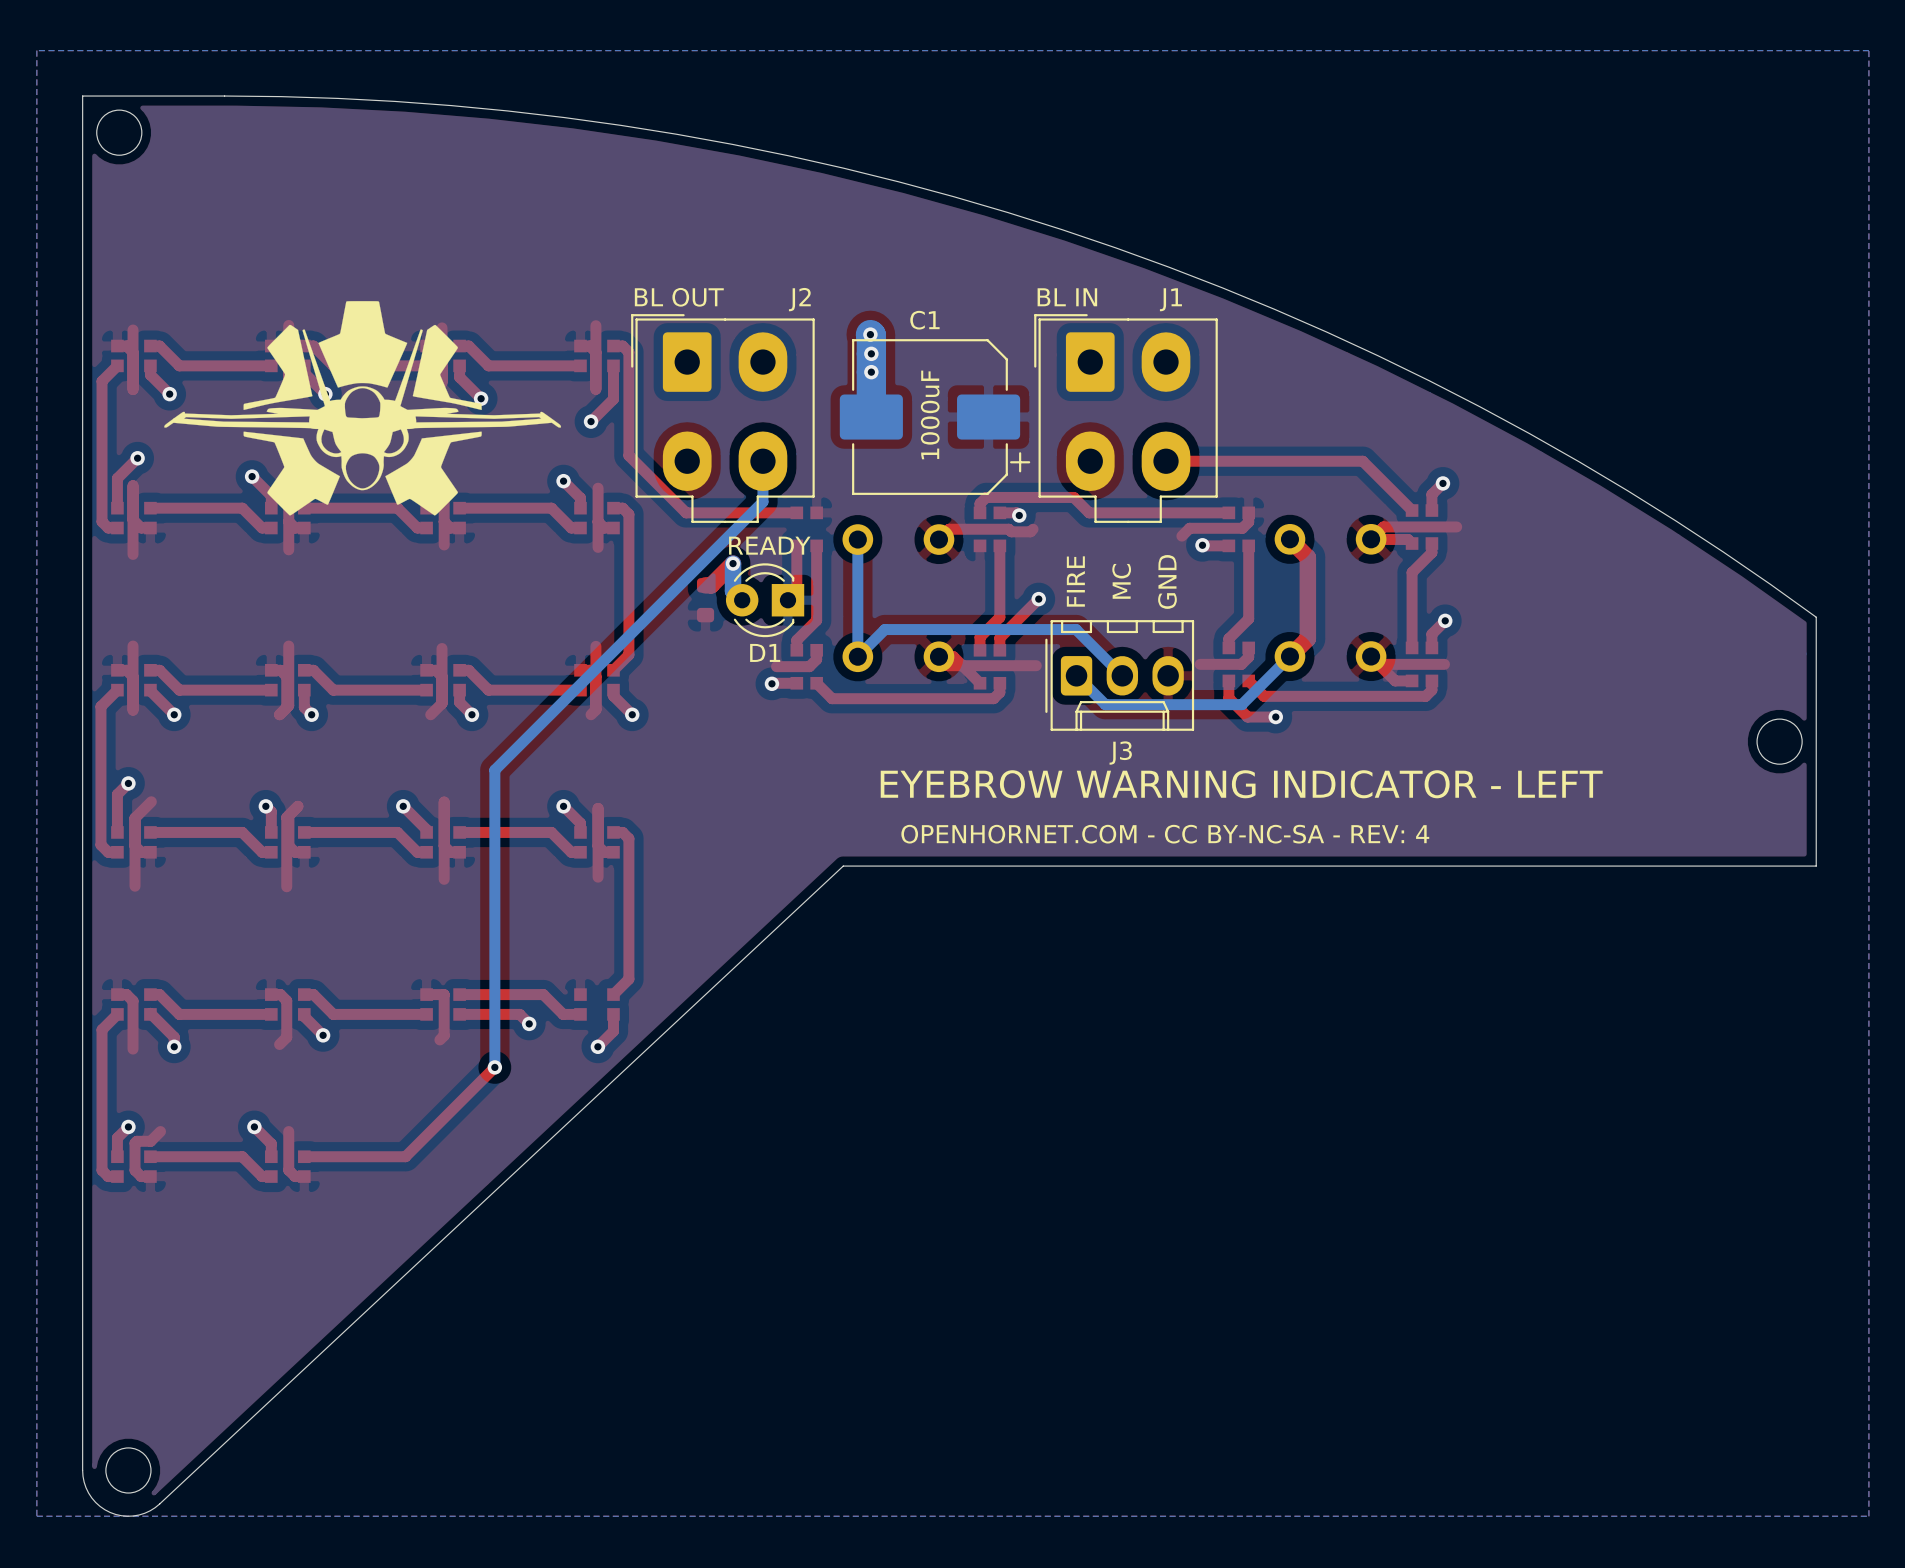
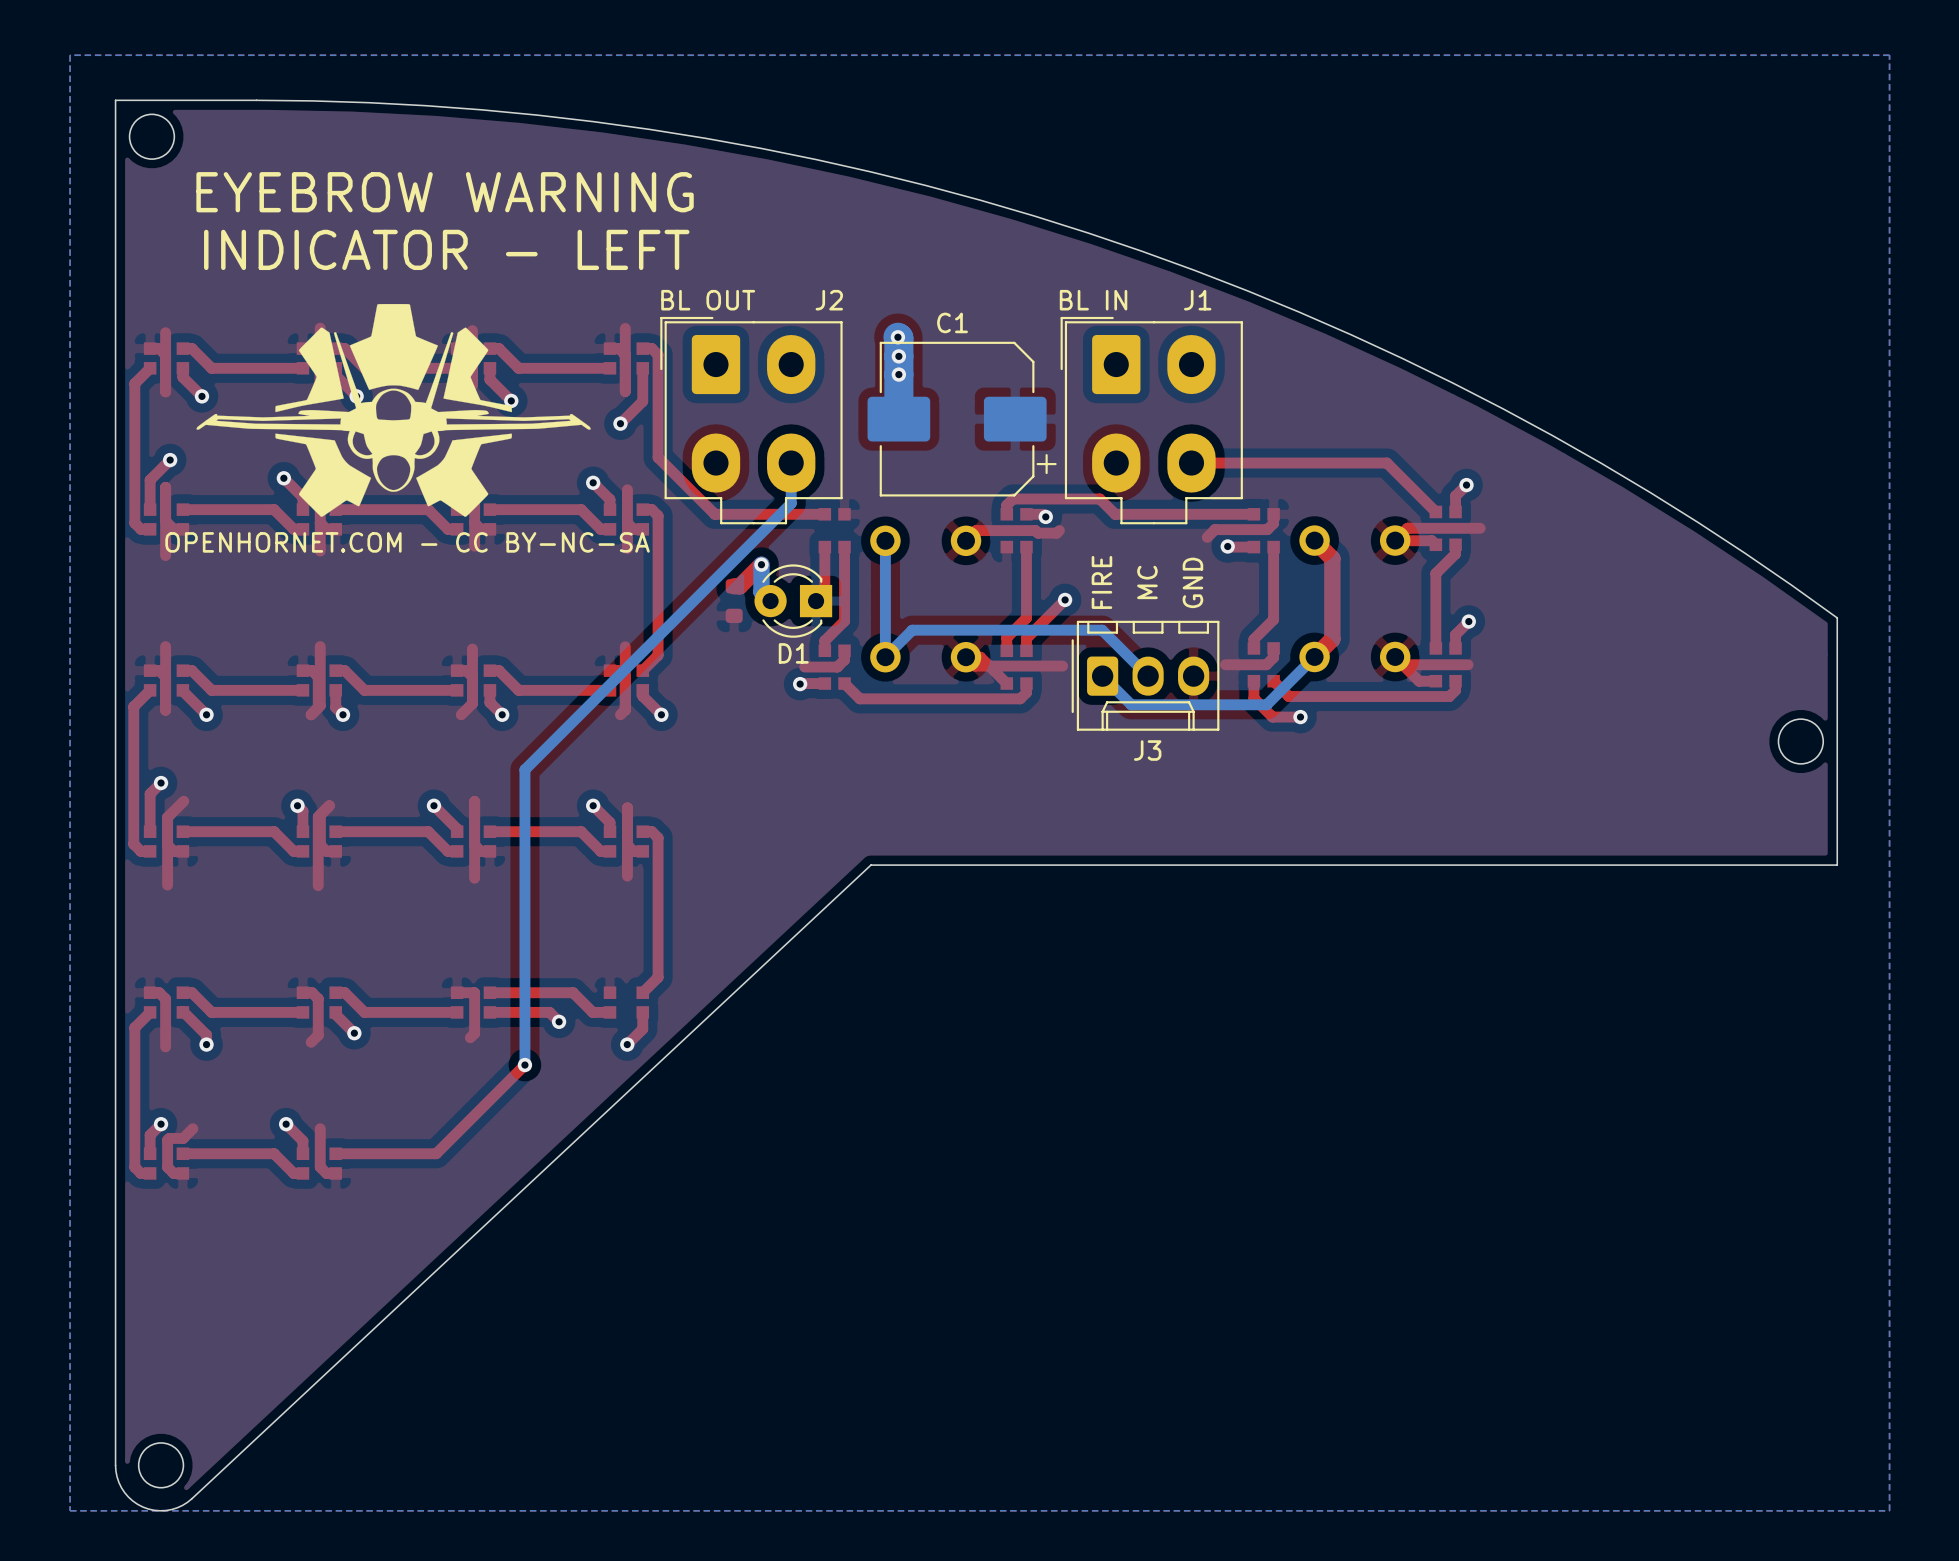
text: none -> EYEBROW WARNING (445, 192)
text: none -> INDICATOR - LEFT (446, 249)
text: 1000uF (930, 414) -> none
text: none -> OPENHORNET.COM - CC BY-NC-SA (407, 542)
text: READY (769, 545) -> none
text: EYEBROW WARNING INDICATOR - LEFT (1241, 784) -> none
text: OPENHORNET.COM - CC BY-NC-SA - REV: 4 (1165, 834) -> none

